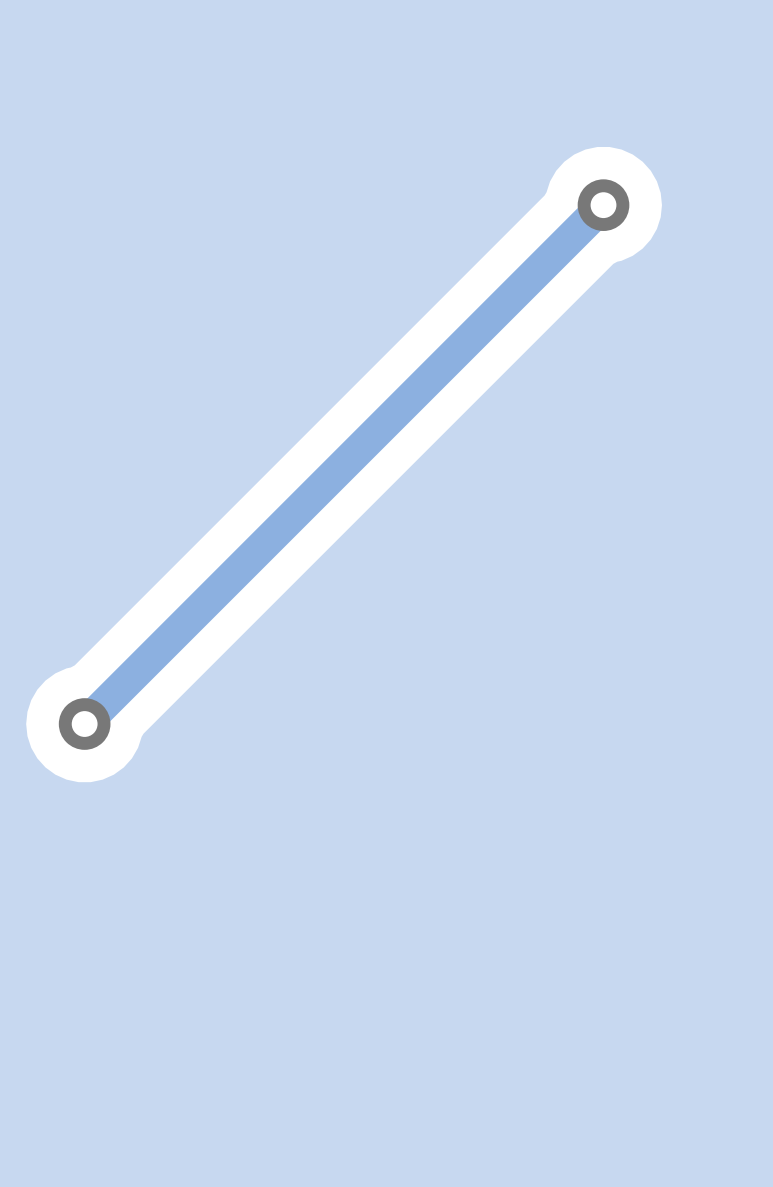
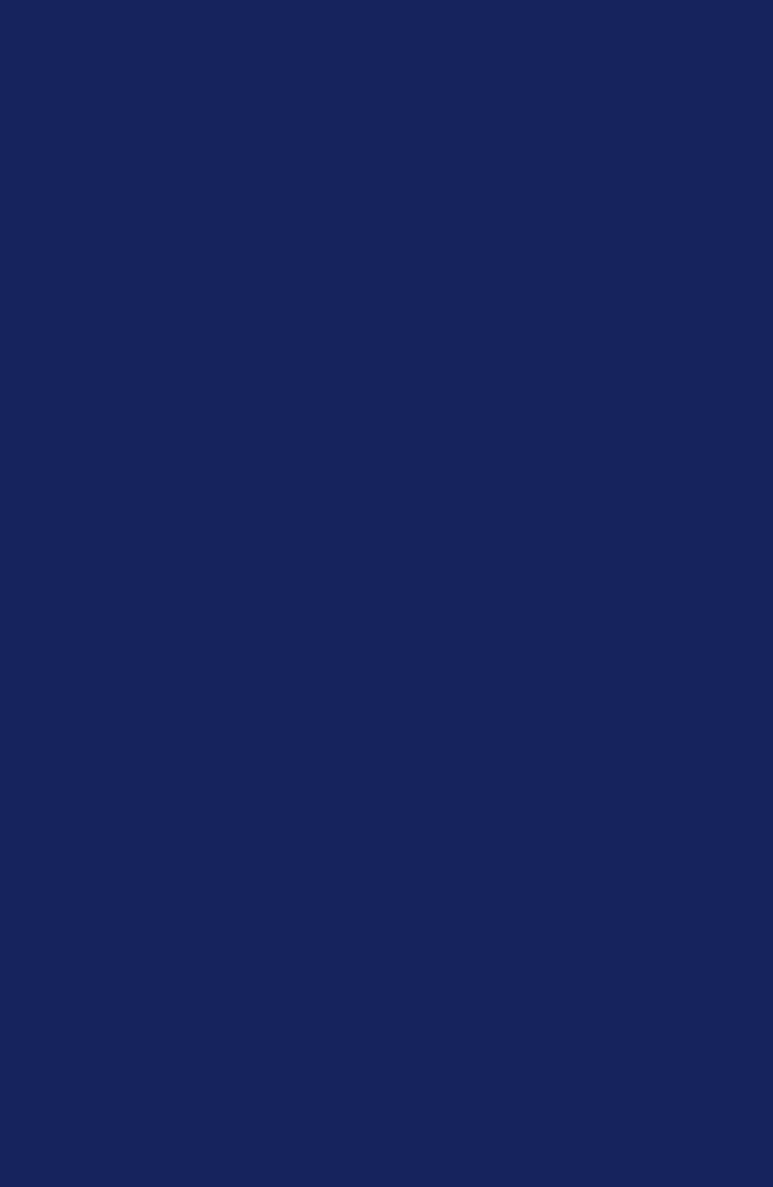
track: (603, 205) (84, 724) -> none
via: (603, 205) -> none
via: (84, 724) -> none

